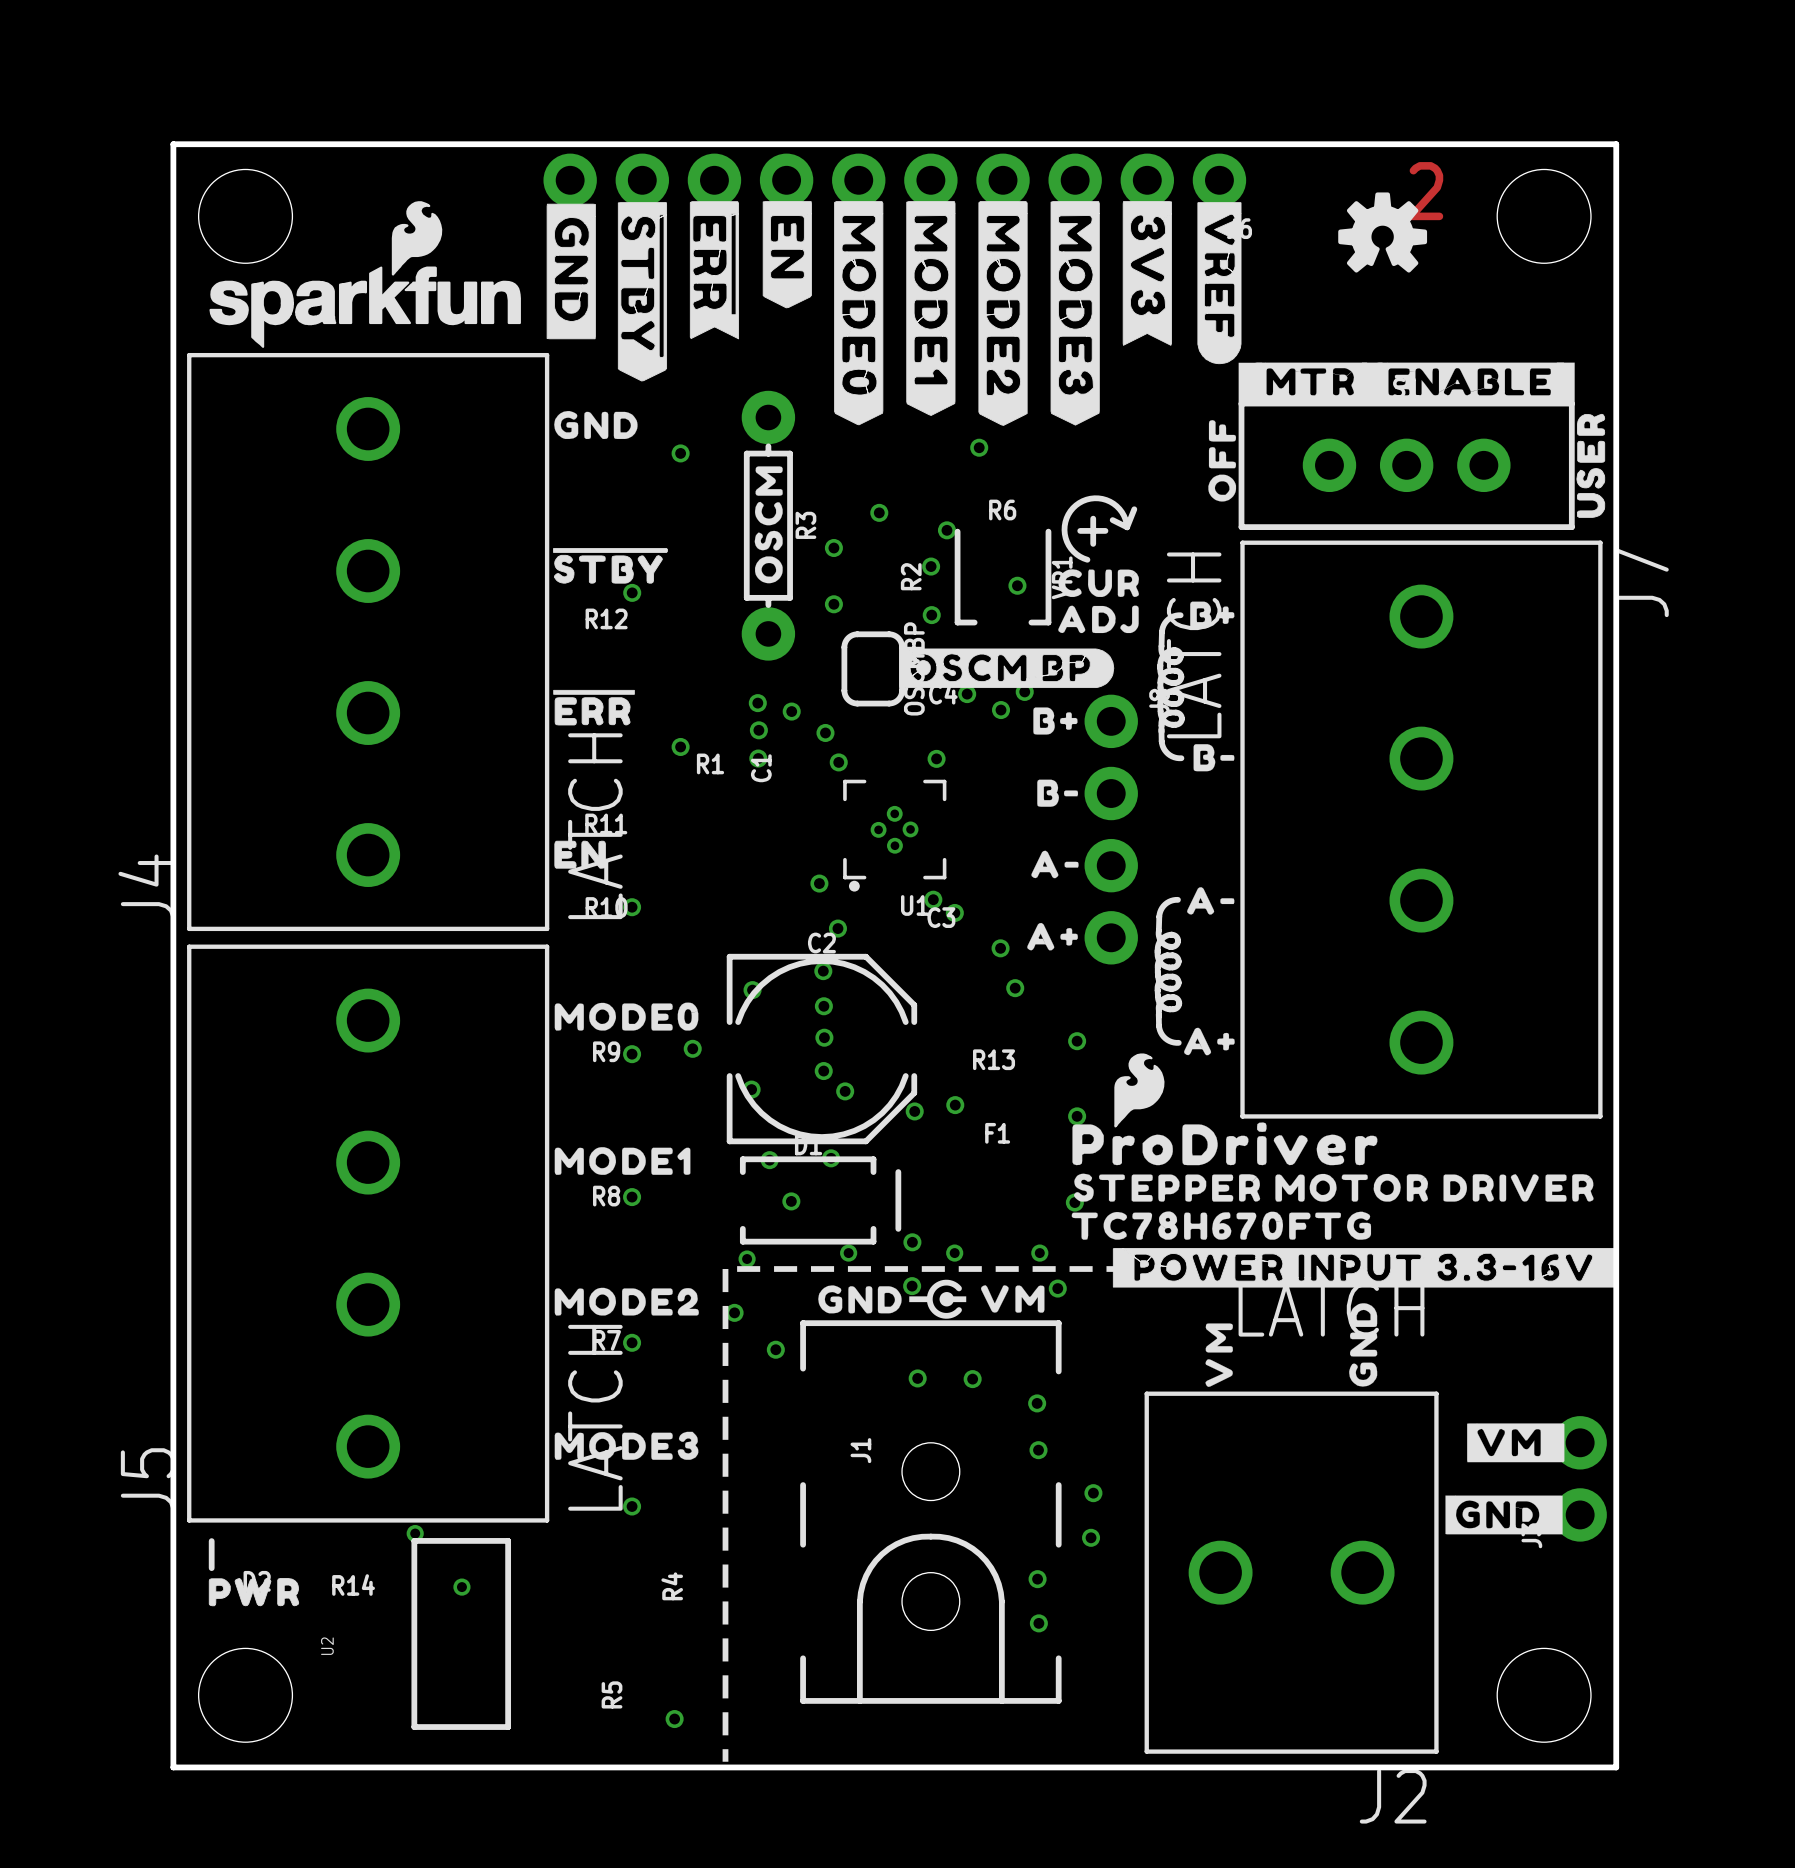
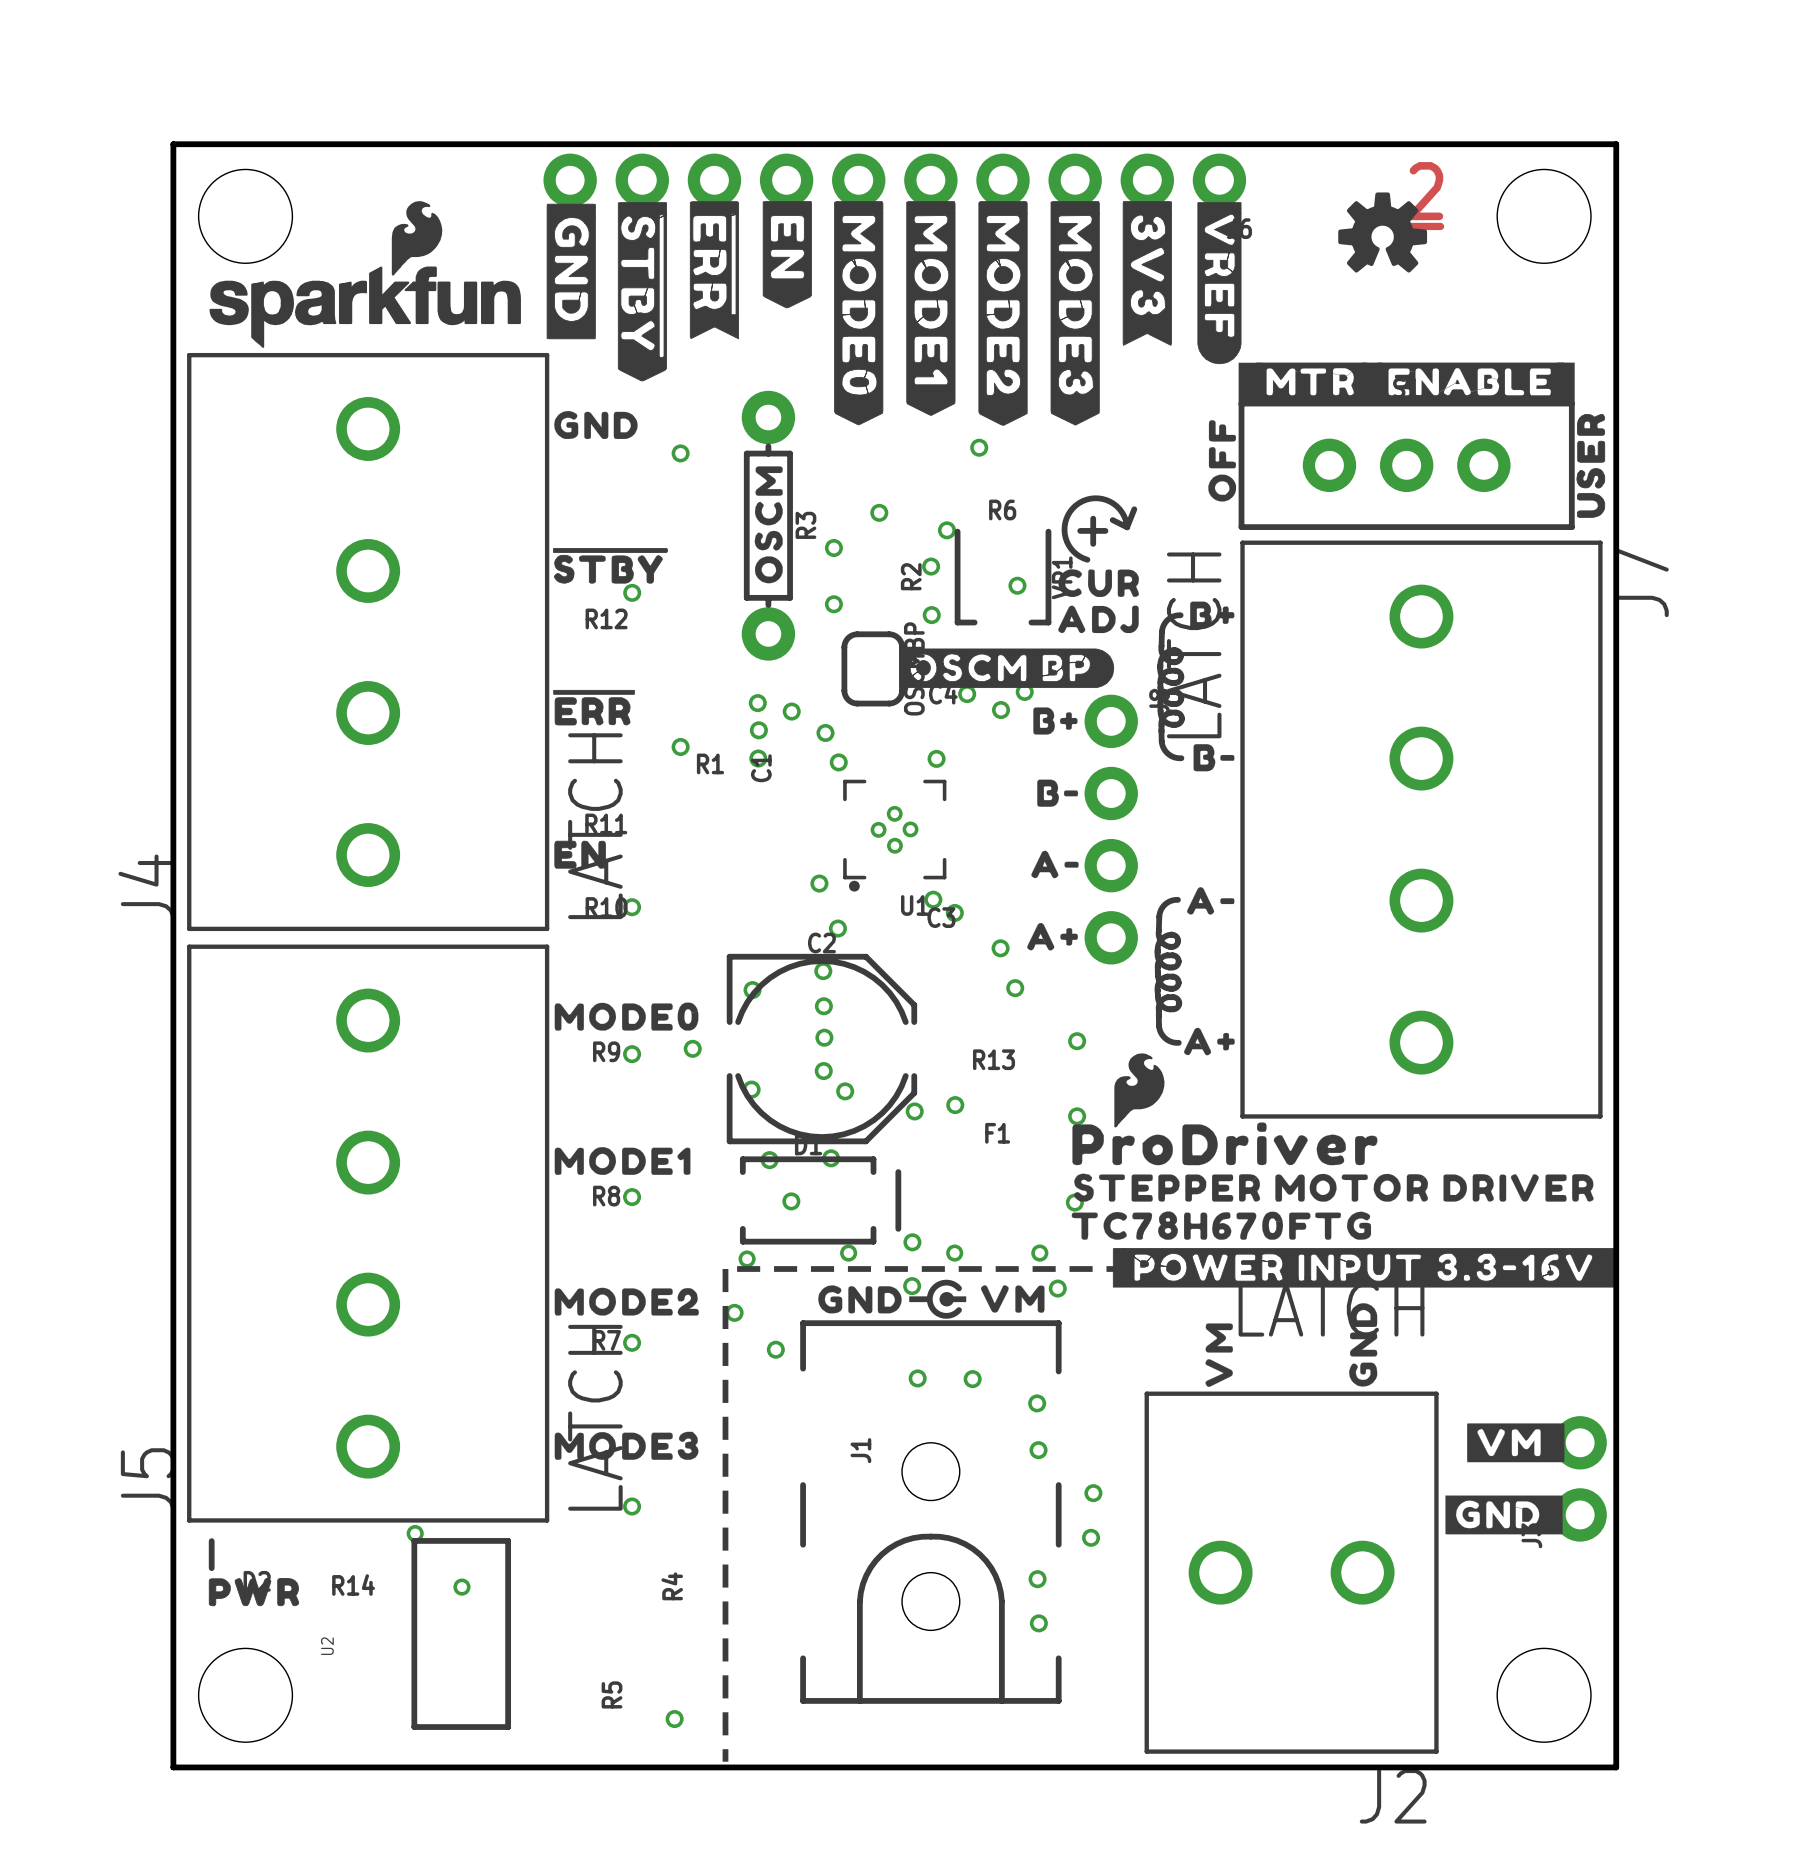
track: none -> (1398, 226) (1440, 226)

